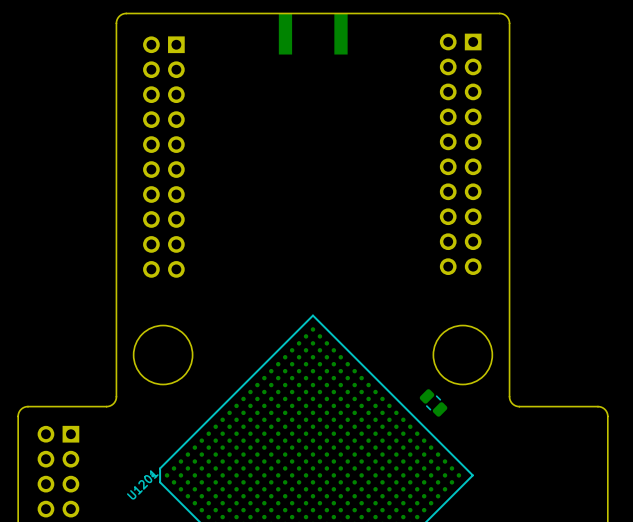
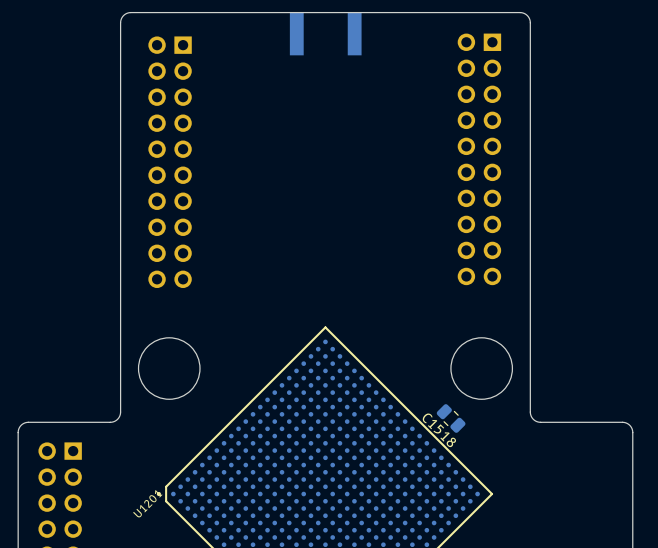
C1518 name: none -> C1518 (439, 430)

